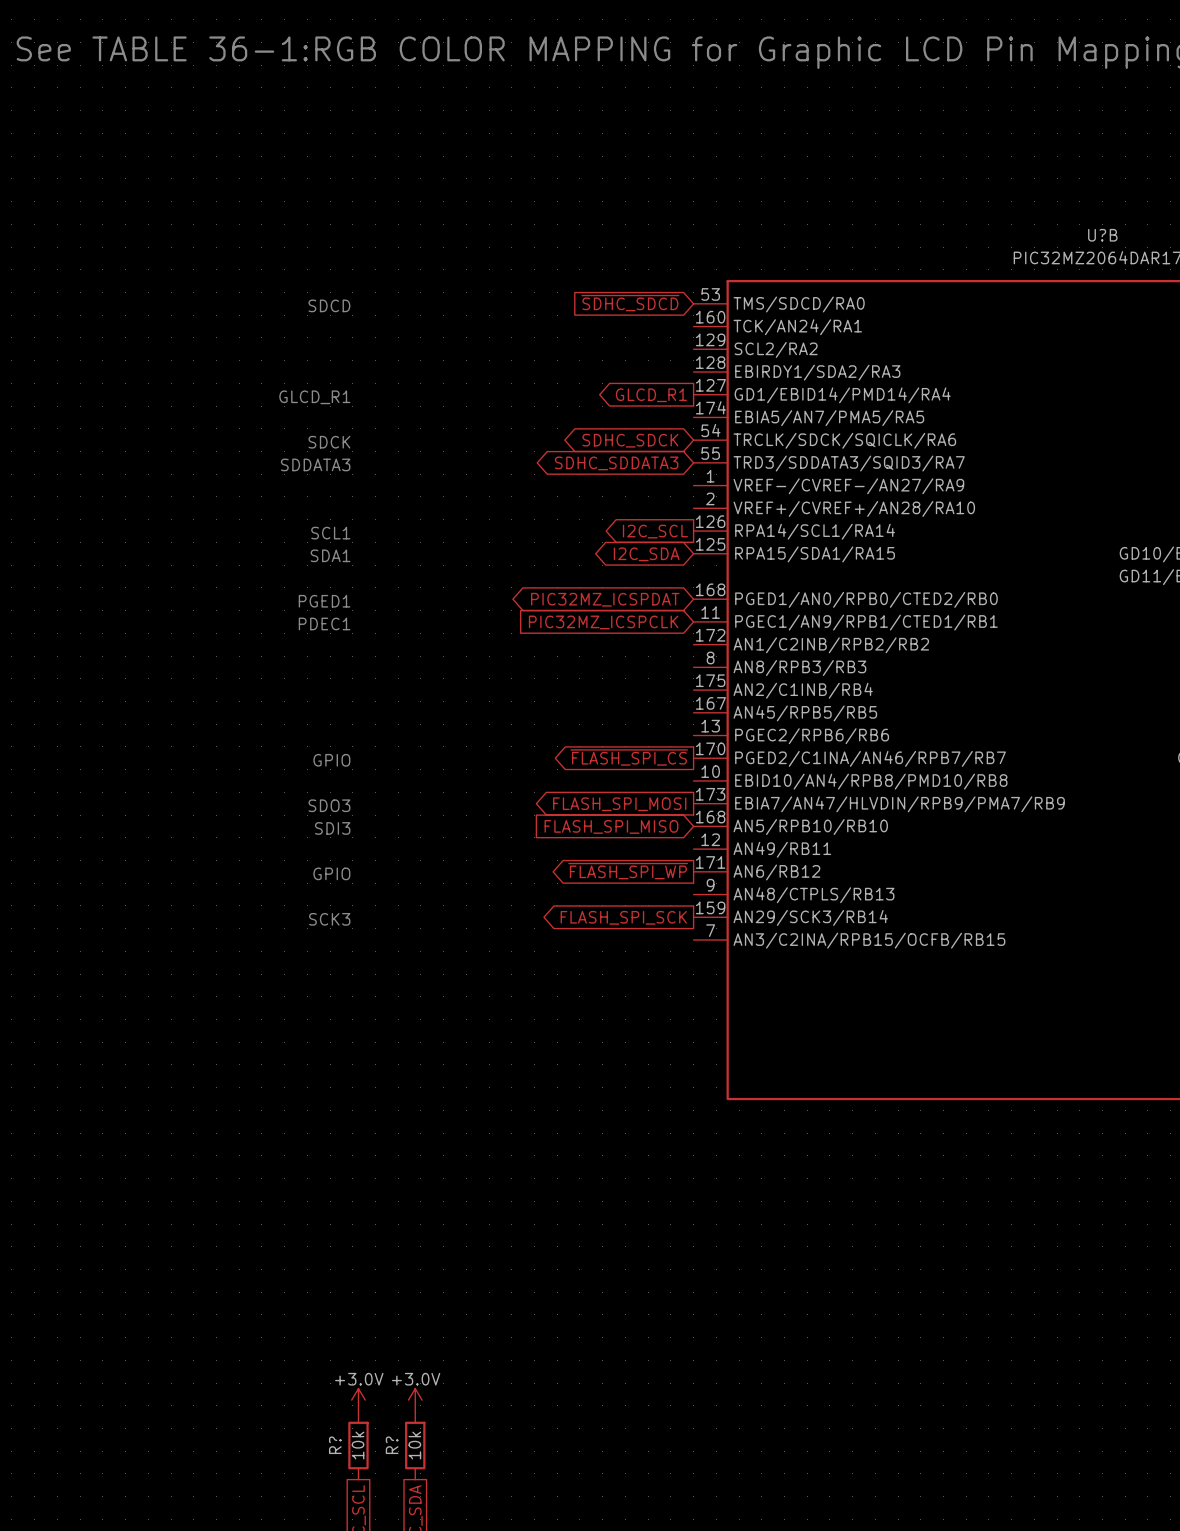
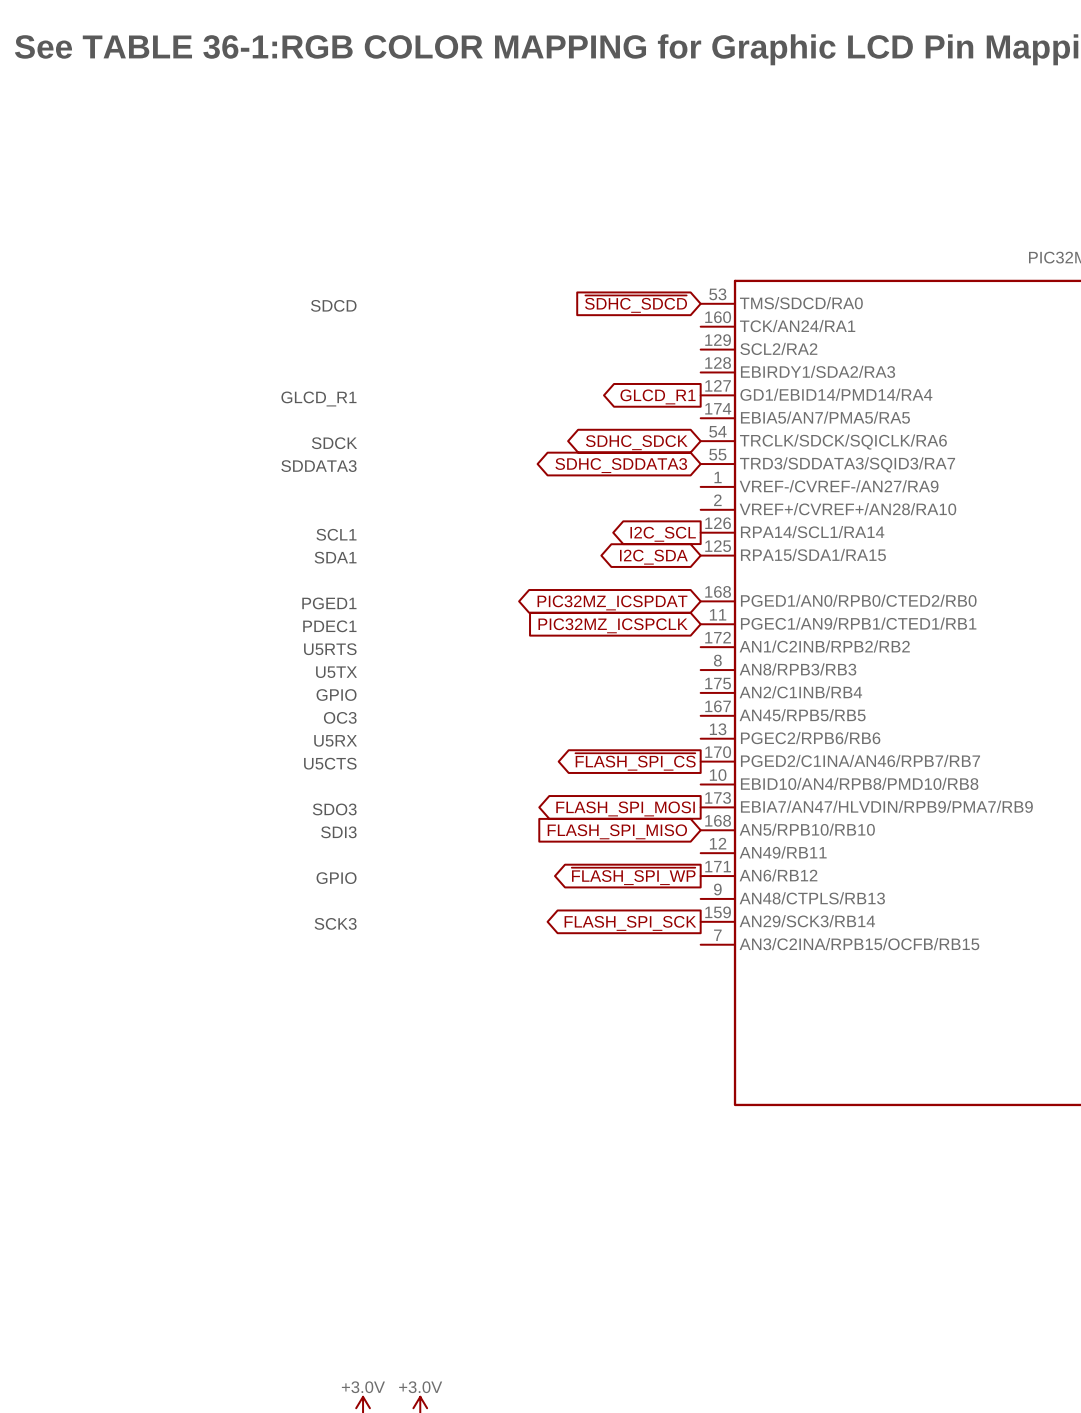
text: none -> U5RTS (330, 649)
text: none -> U5TX (336, 672)
text: none -> GPIO (336, 695)
text: none -> OC3 (340, 717)
text: none -> U5RX (335, 740)
text: GPIO (331, 760) -> U5CTS (330, 763)

